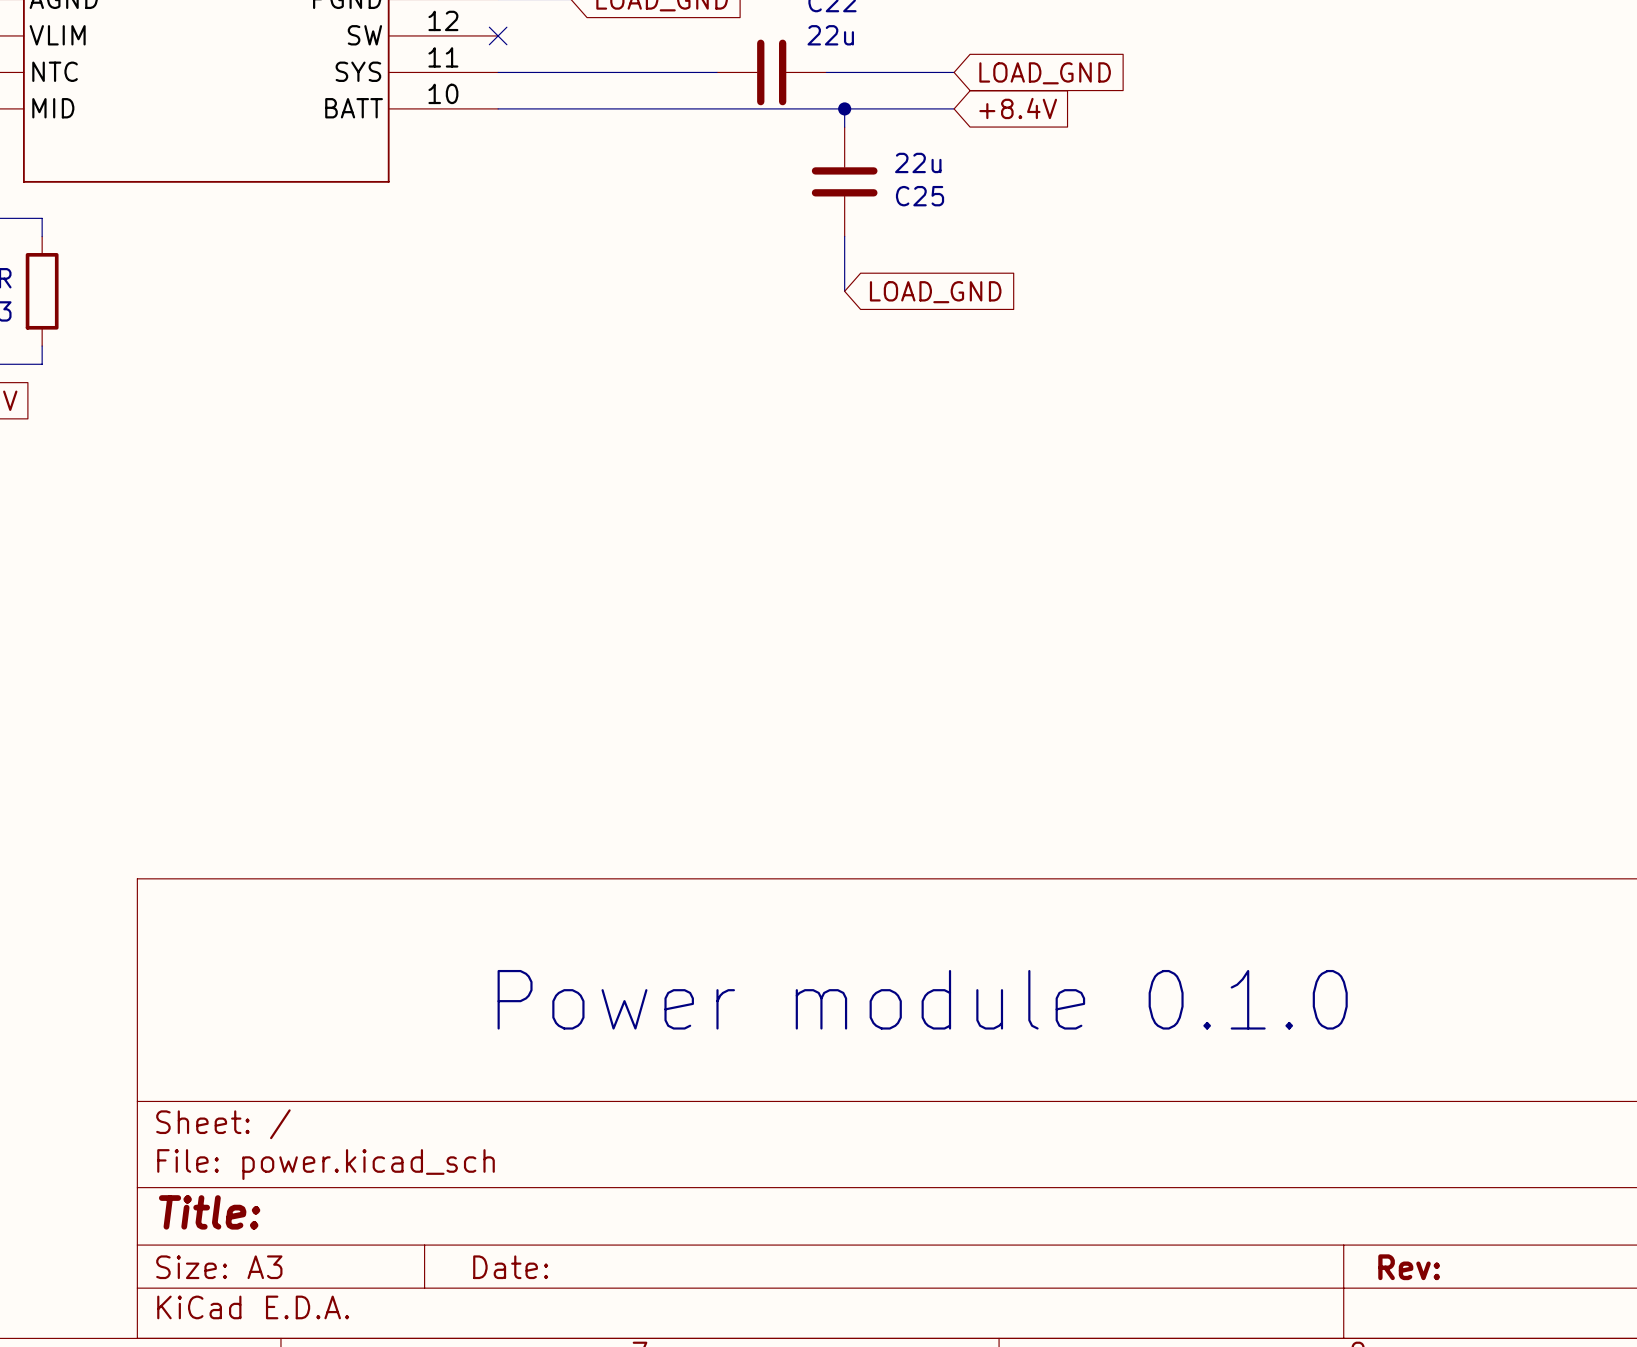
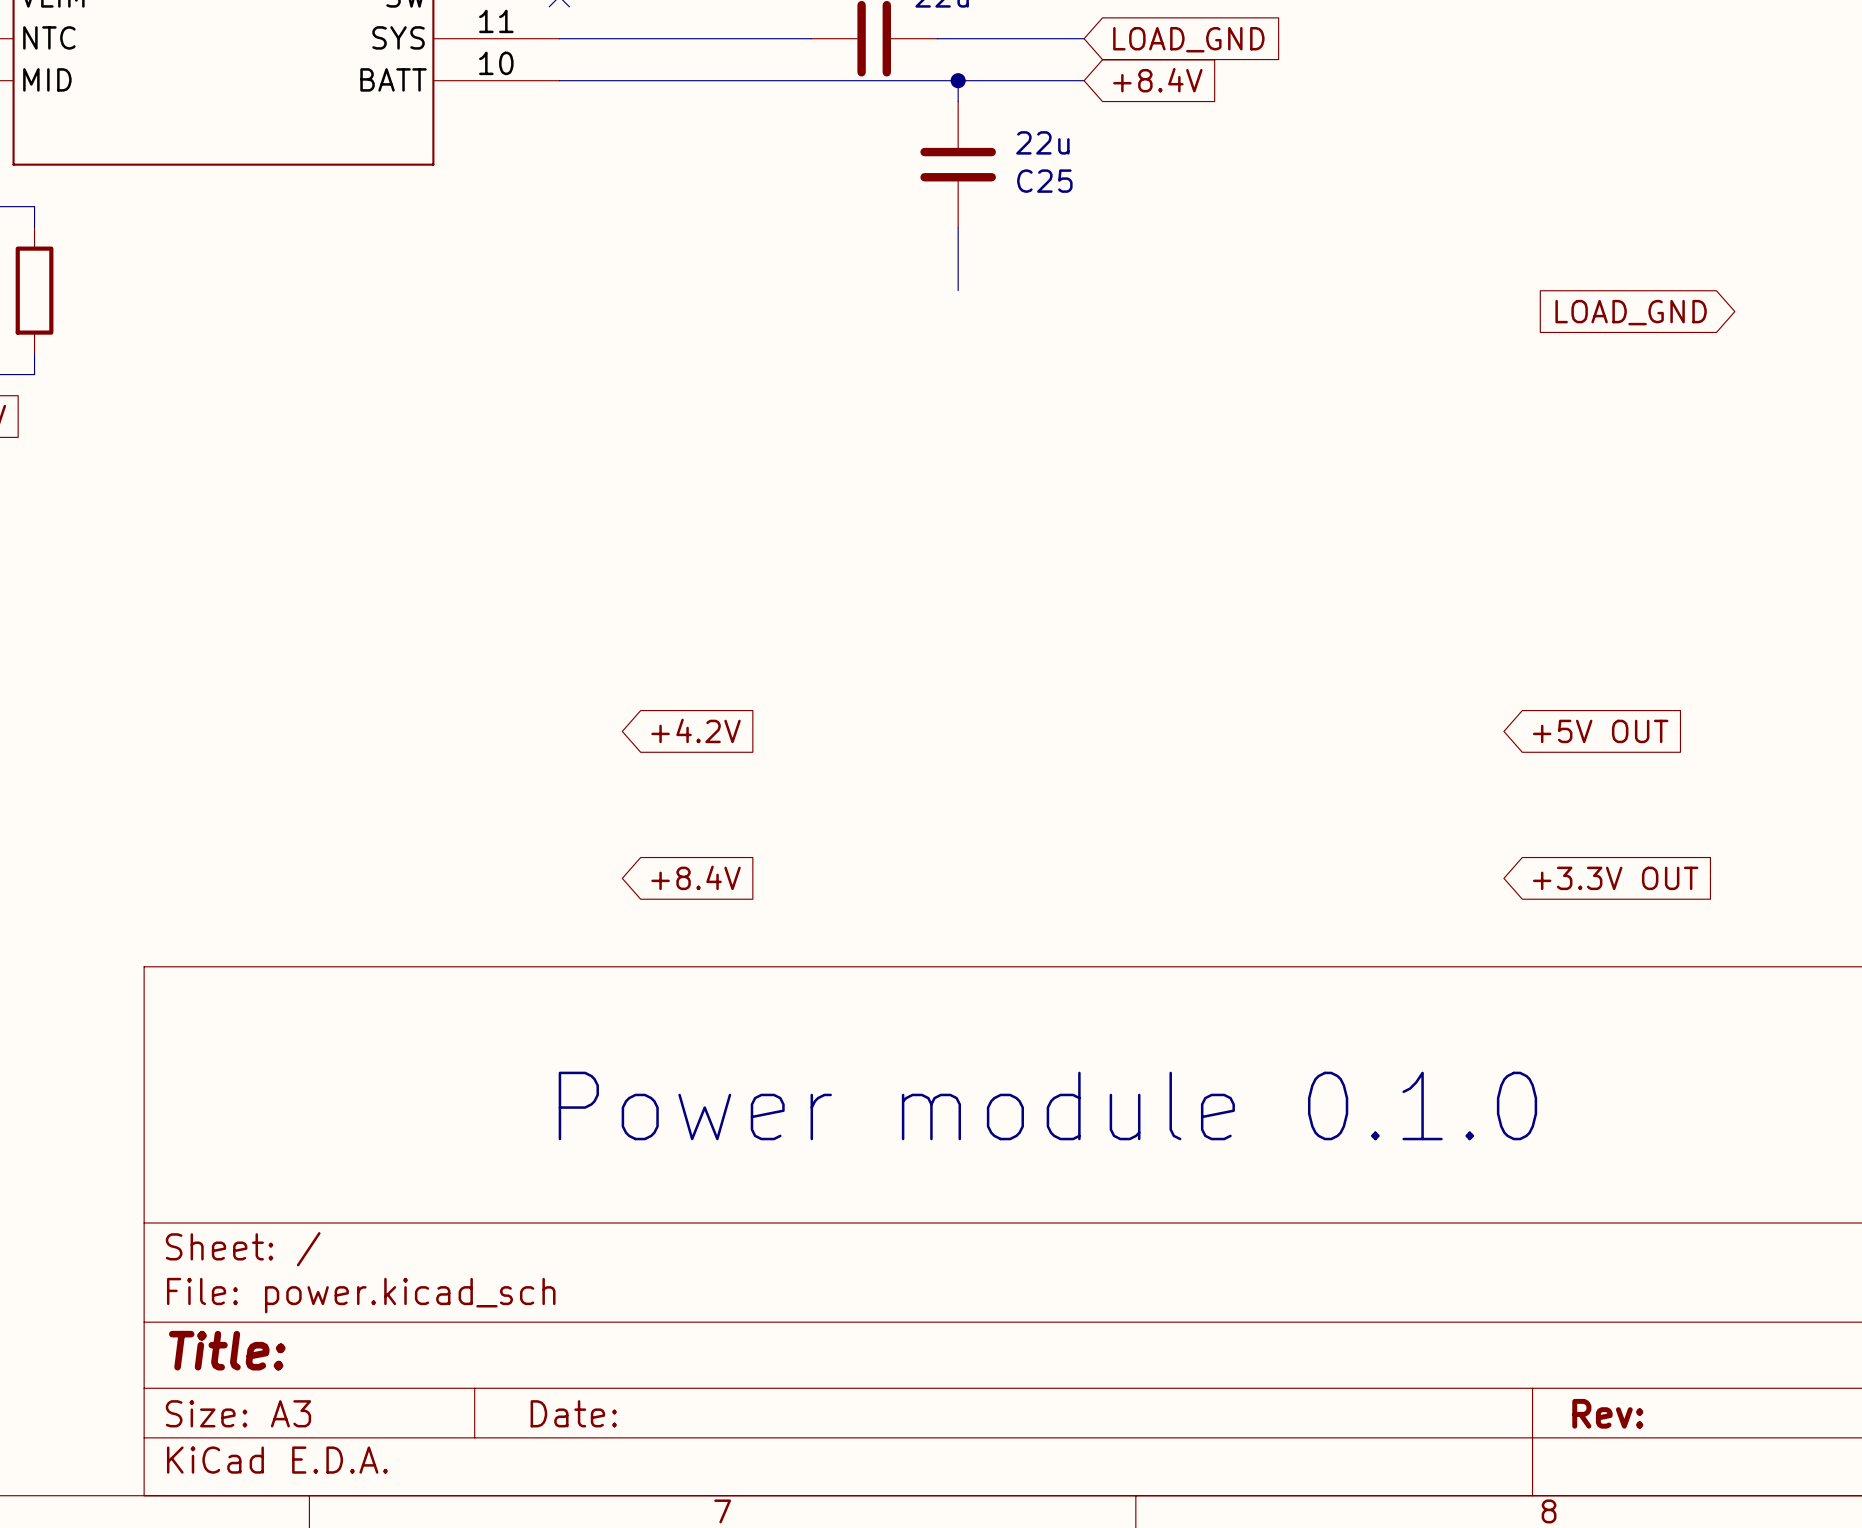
global label: LOAD_GND (935, 292) -> none
global label: none -> LOAD_GND (1631, 312)
global label: none -> +4.2V (696, 730)
global label: none -> +5V OUT (1600, 731)
global label: none -> +8.4V (696, 877)
global label: none -> +3.3V OUT (1615, 878)

